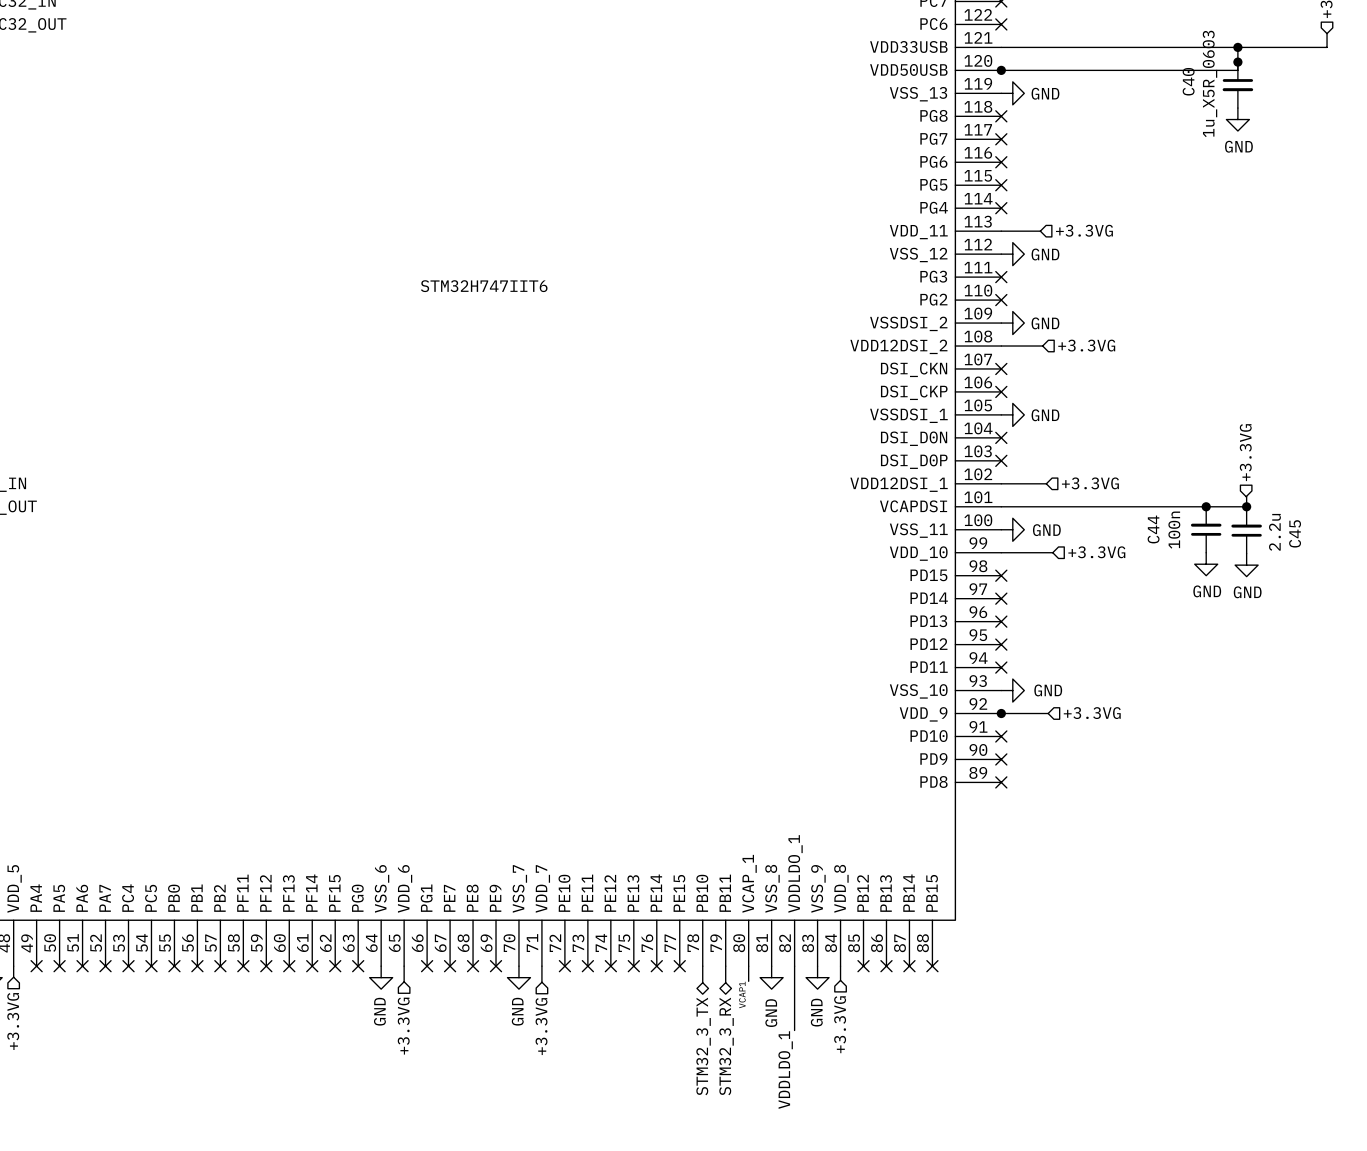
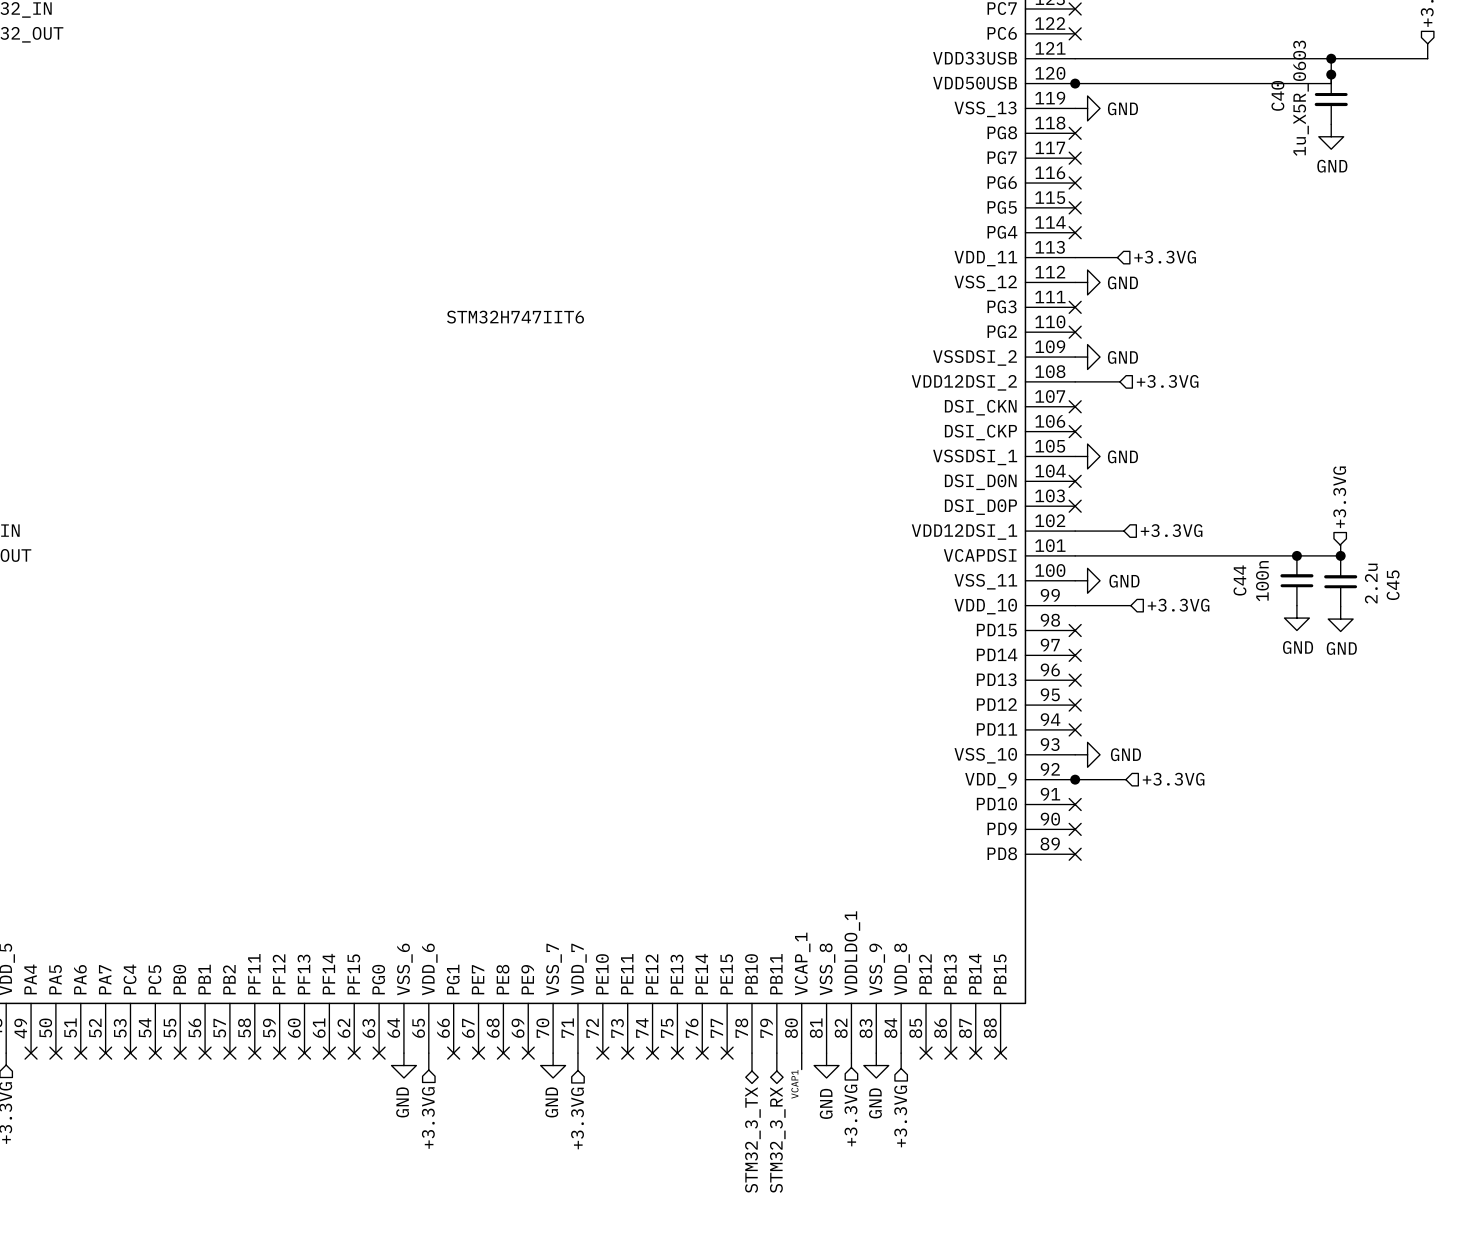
wire: (794, 979) (794, 1030) -> none
hierarchical label: none -> +3.3VG (850, 1115)
label: VDDLDO_1 (785, 1070) -> none

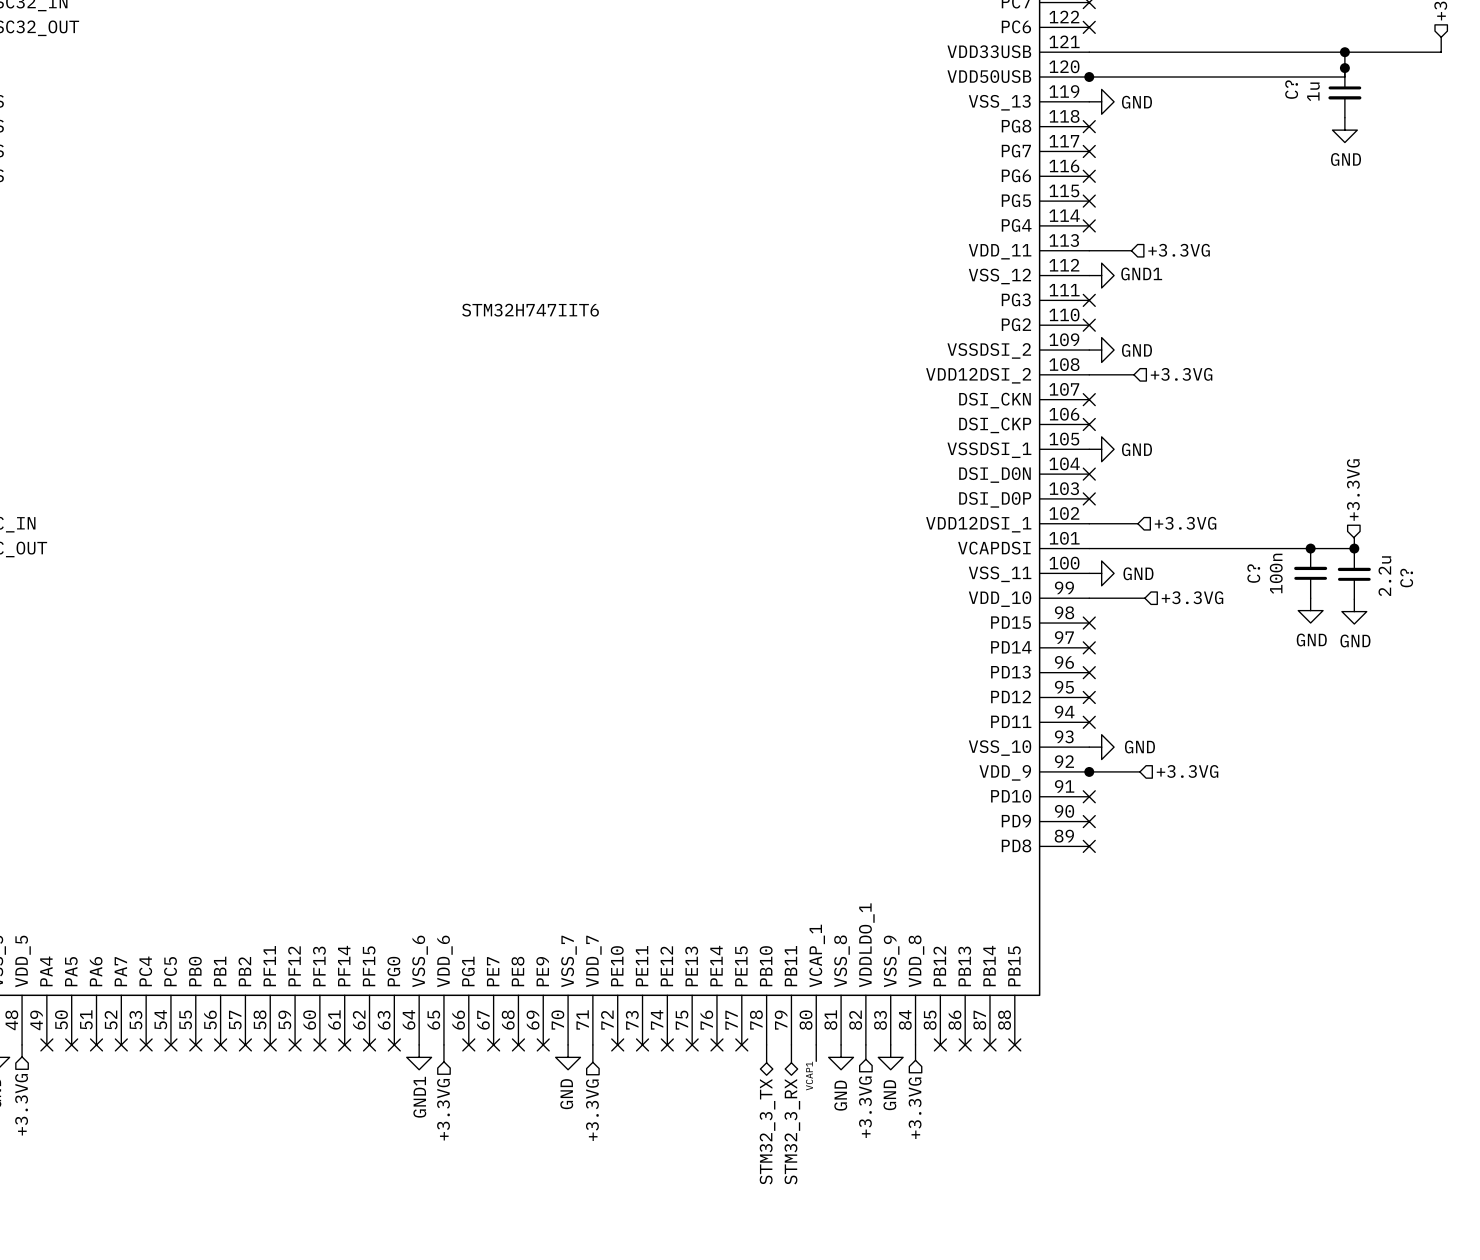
C40 name: C40 (1277, 95) -> C? (1291, 89)
C40 value: 1u_X5R_0603 (1301, 98) -> 1u (1313, 91)
power symbol: GND (1087, 282) -> GND1 (1101, 275)
C44 name: C44 (1239, 580) -> C? (1253, 573)
C45 name: C45 (1393, 585) -> C? (1406, 578)
power symbol: GND (403, 1065) -> GND1 (419, 1057)

